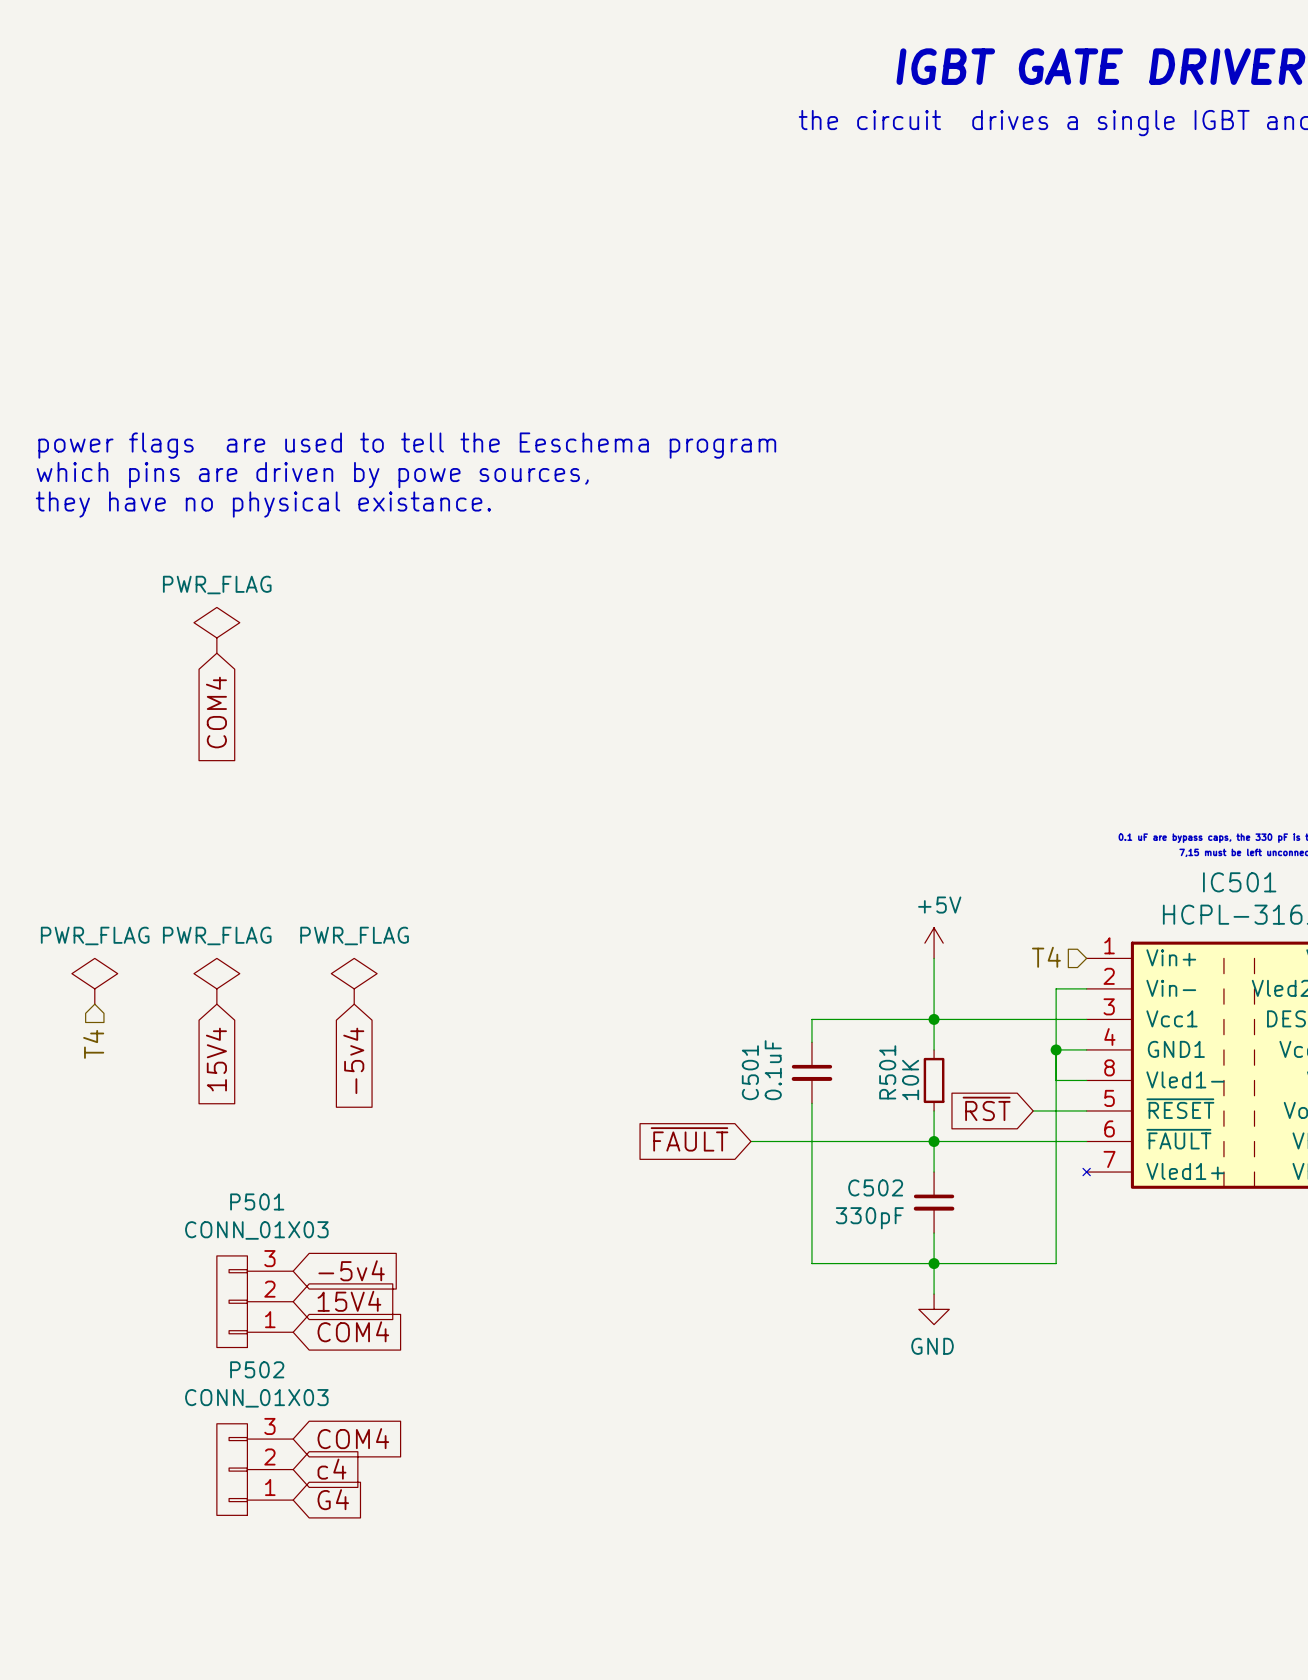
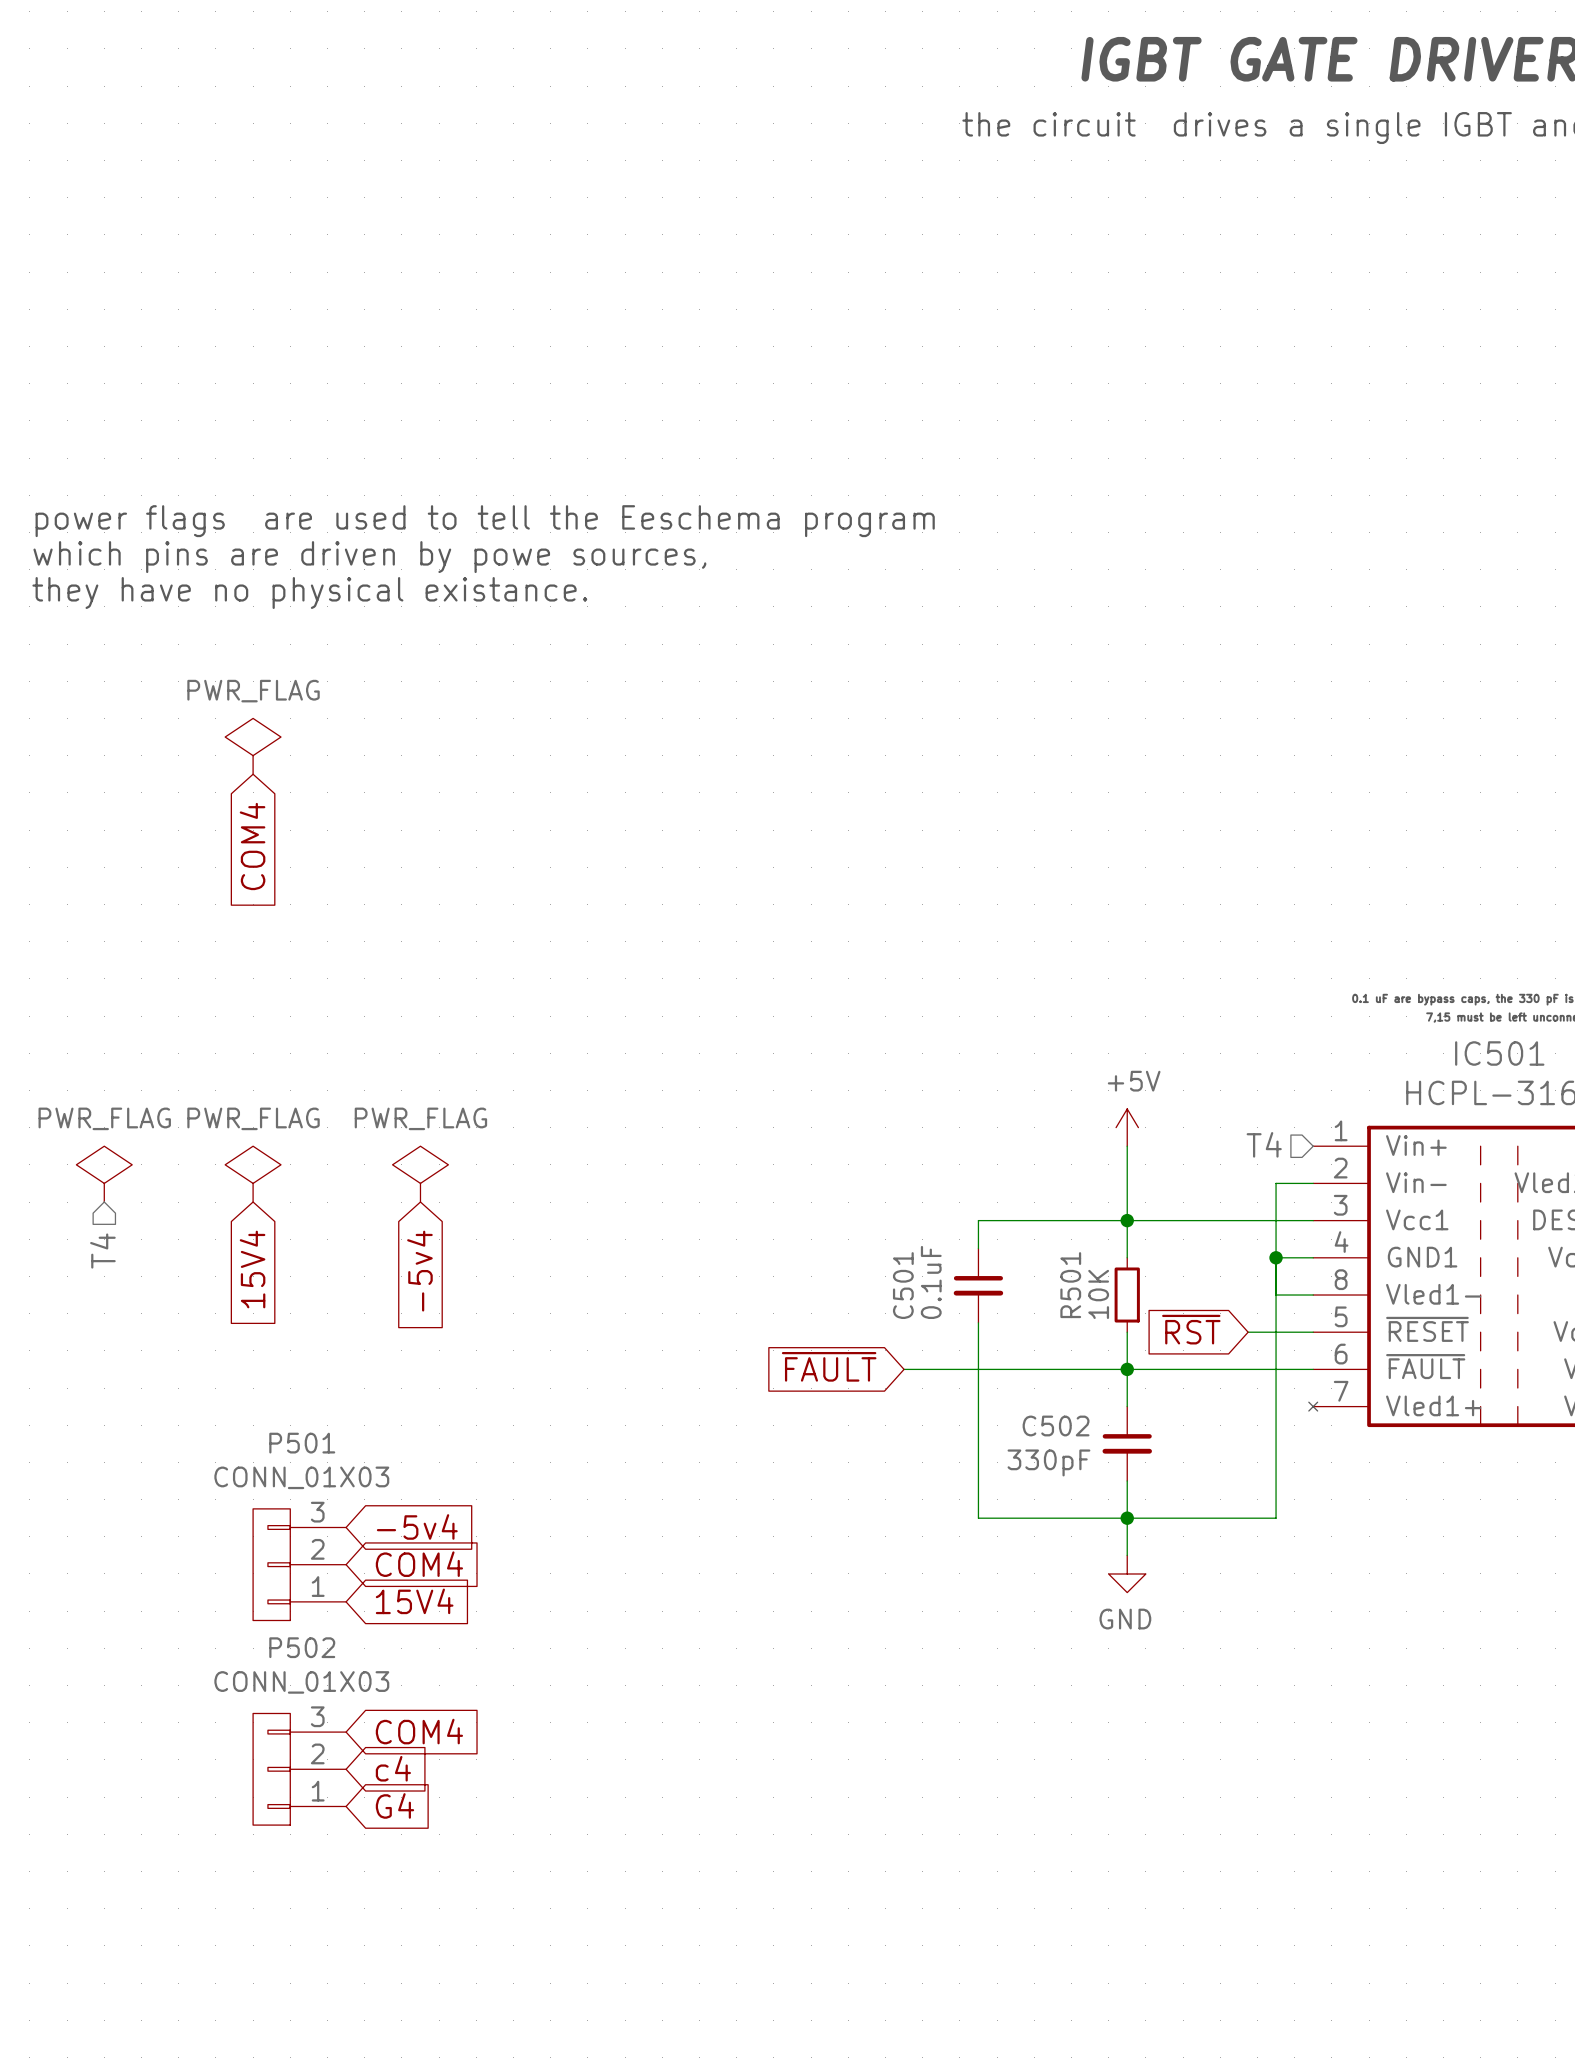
global label: 15V4 (349, 1301) -> COM4 (419, 1564)
global label: COM4 (353, 1331) -> 15V4 (414, 1601)

